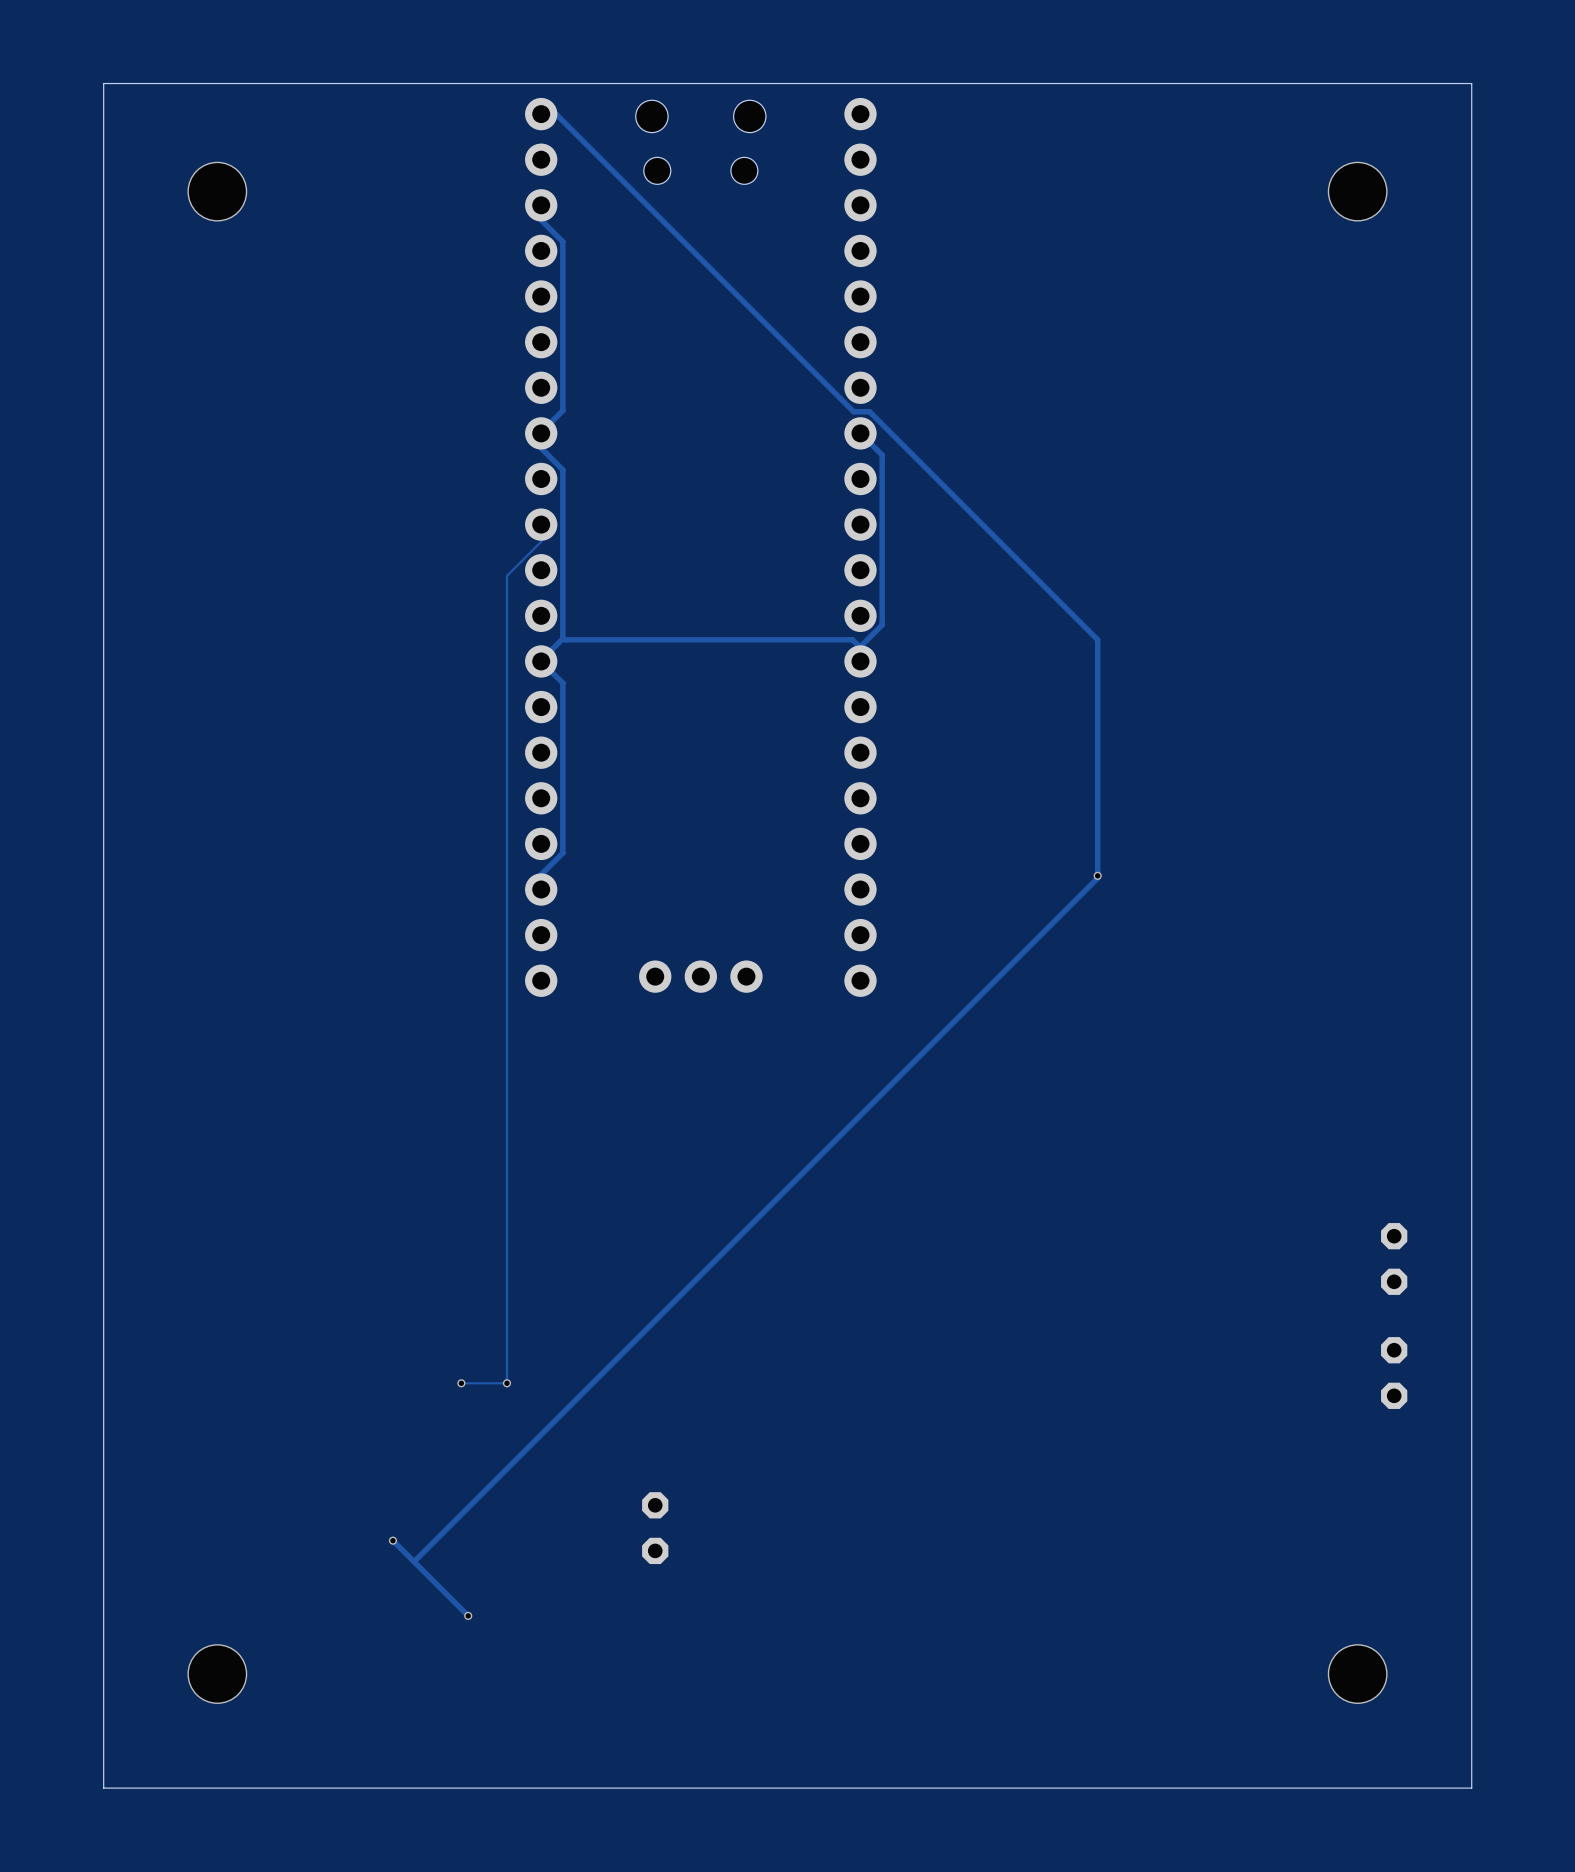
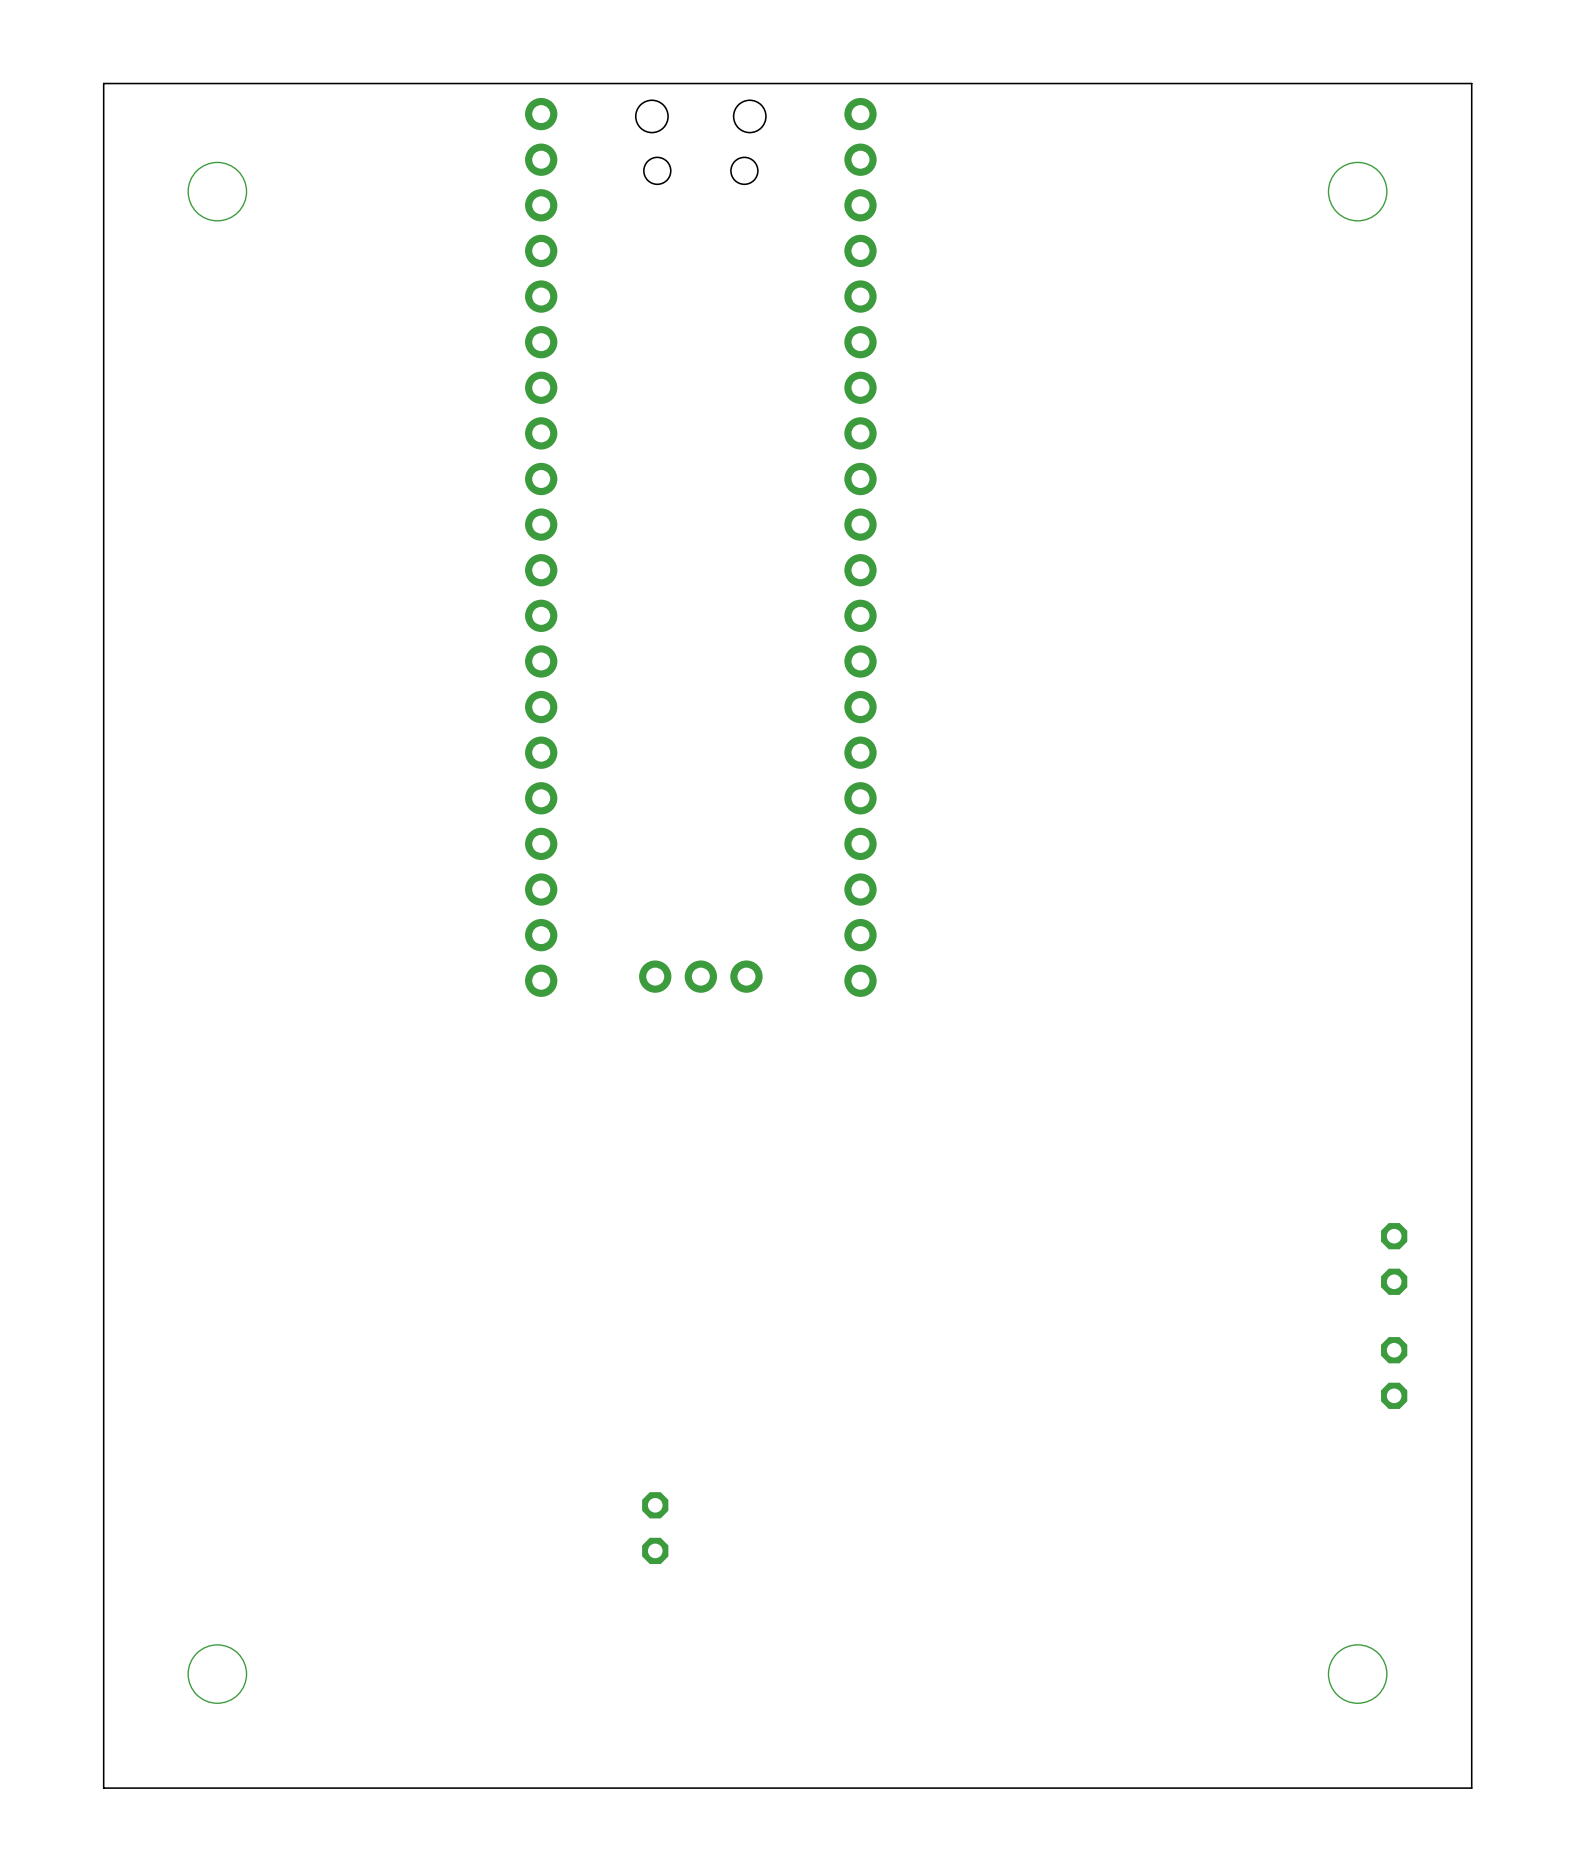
track: (541, 114) (556, 114) (853, 411) (869, 411) (1097, 639) (1097, 878) (414, 1561) -> none
track: (541, 205) (541, 220) (562, 241) (562, 410) (541, 433) (541, 448) (562, 469) (562, 638) -> none
track: (860, 433) (882, 455) (882, 624) (860, 646) (860, 661) (858, 645) (852, 639) (562, 638) -> none
track: (541, 524) (541, 541) (506, 575) (506, 1383) (461, 1383) -> none
track: (562, 638) (541, 661) (562, 683) (562, 853) (541, 874) (541, 889) -> none
via: (1097, 875) -> none
via: (461, 1383) -> none
via: (506, 1383) -> none
track: (392, 1540) (468, 1615) -> none
via: (392, 1540) -> none
via: (468, 1615) -> none

